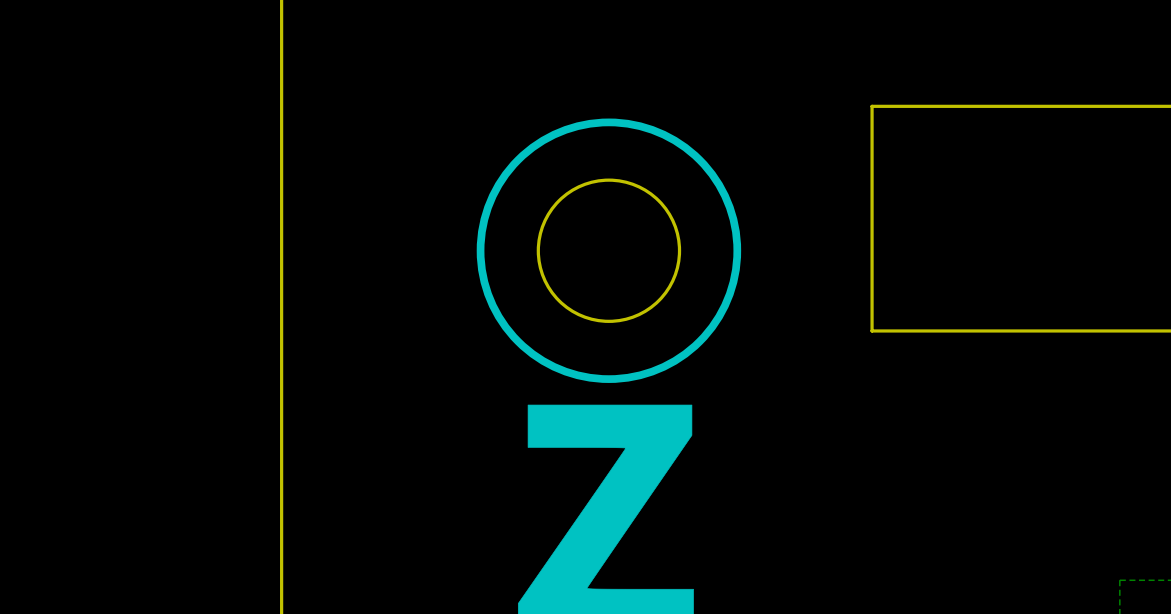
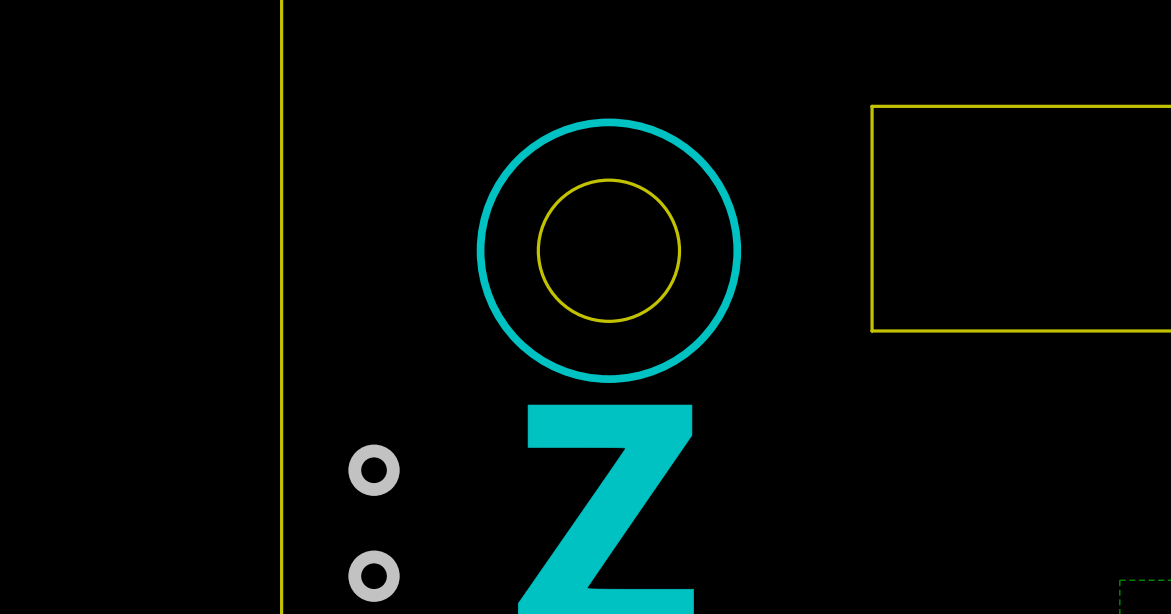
via: none -> (374, 470)
via: none -> (374, 576)

